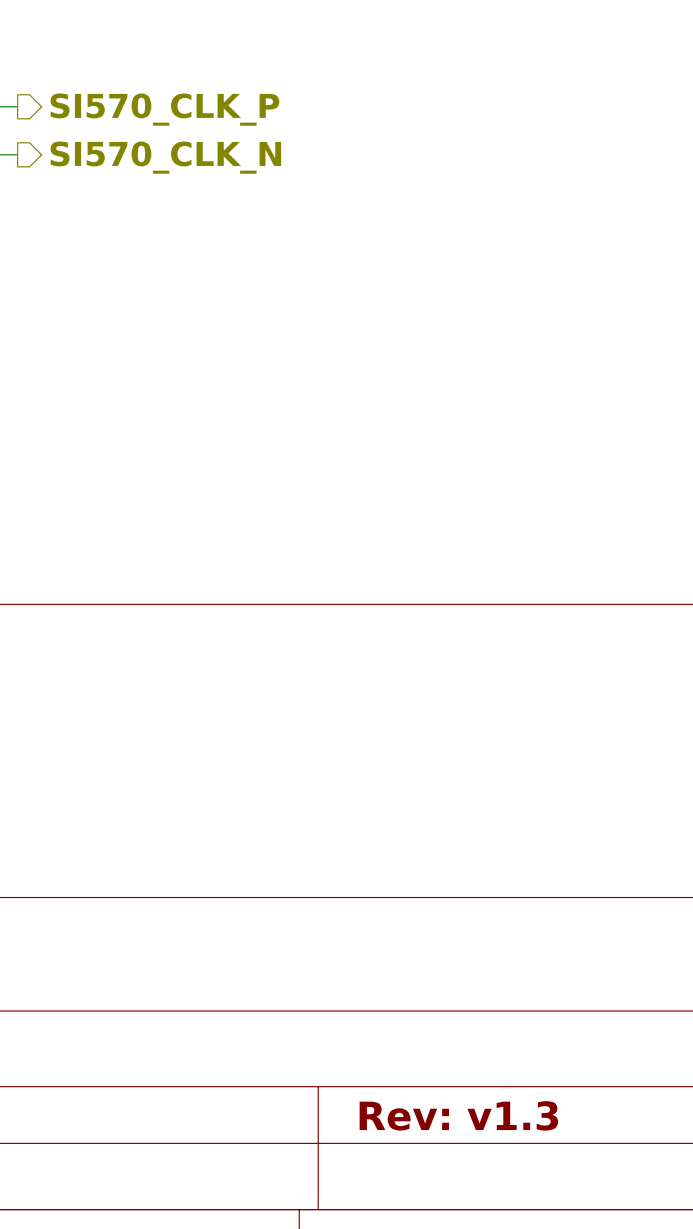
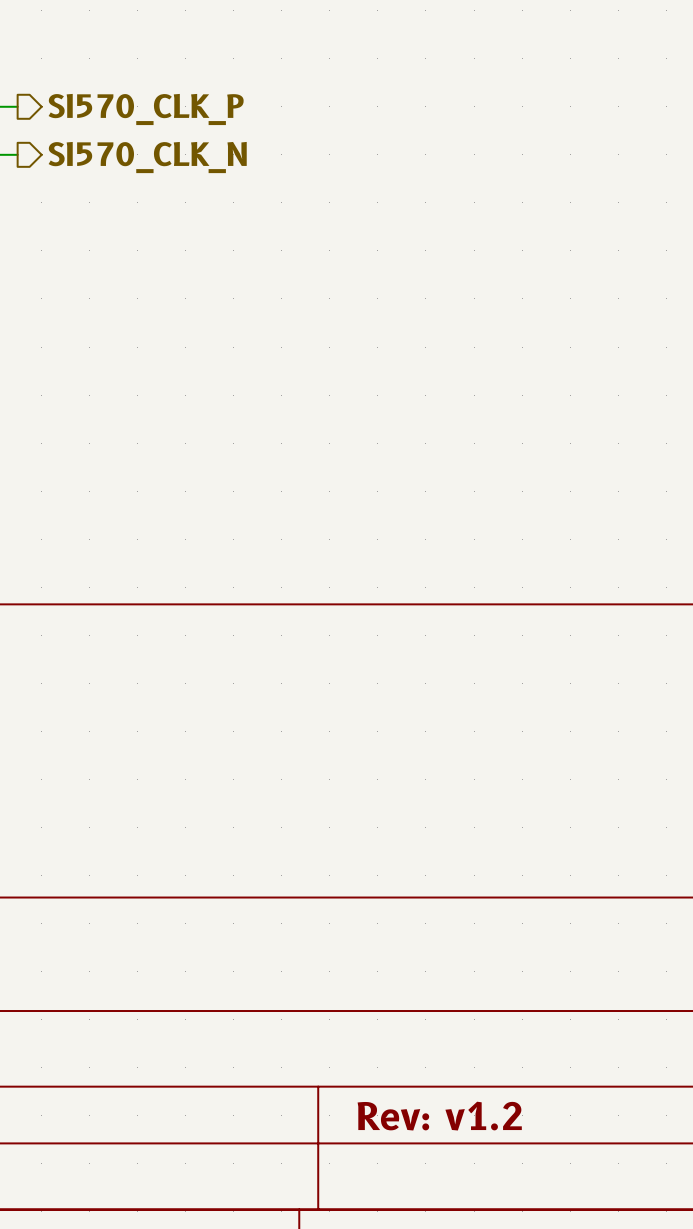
title block: Rev: v1.3 (458, 1115) -> Rev: v1.2 (439, 1116)

